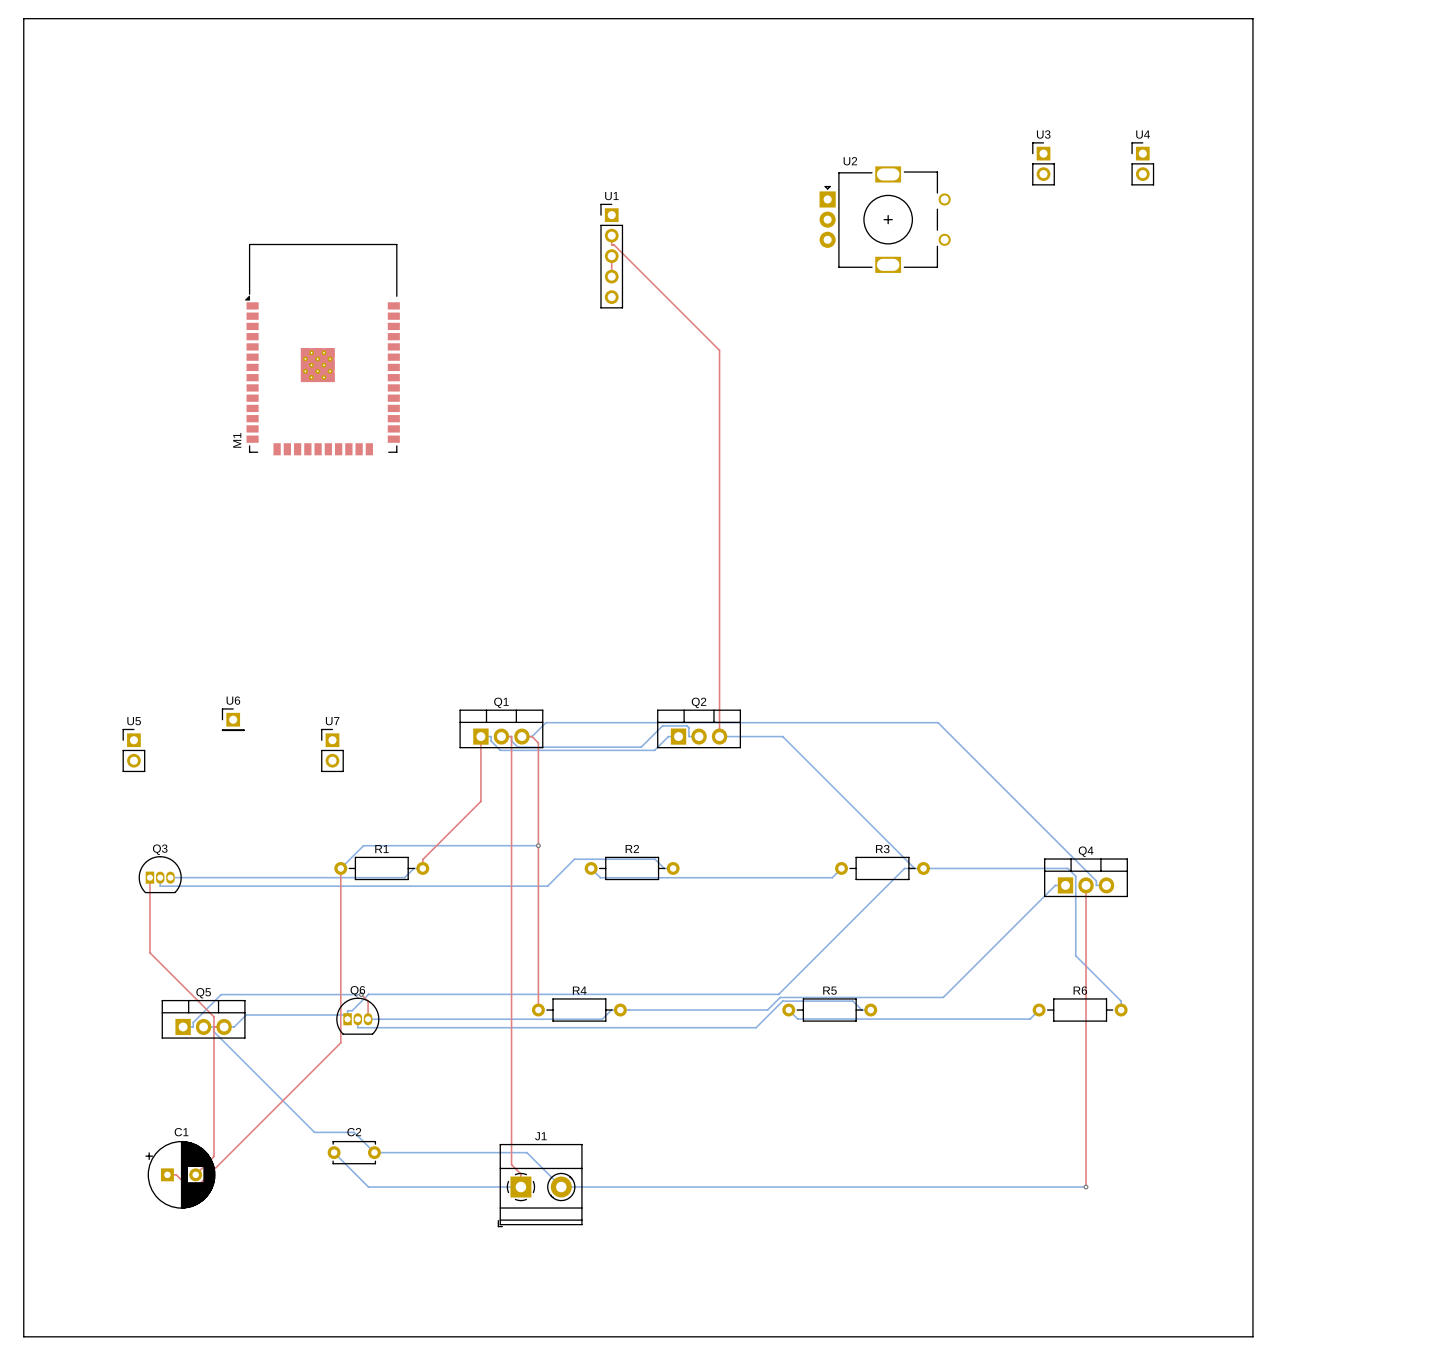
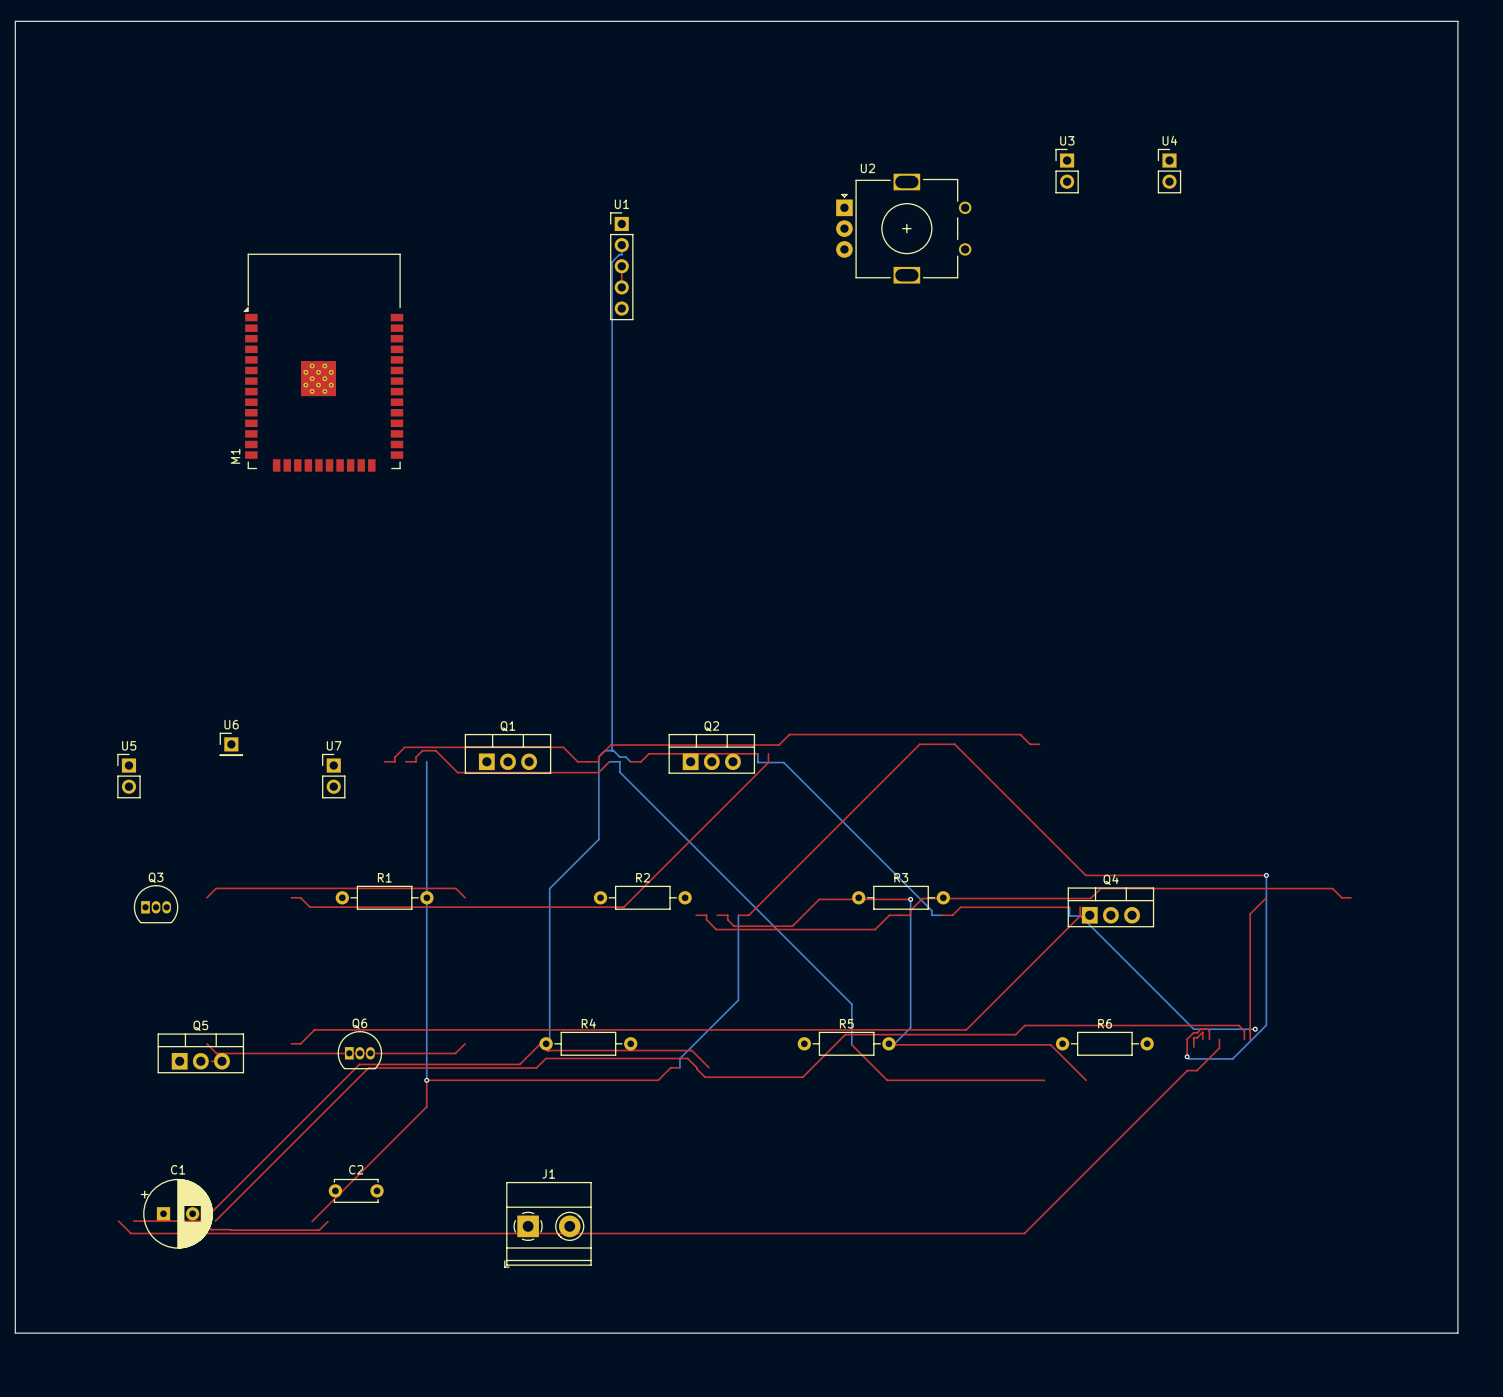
board edge: (1252, 18) (1252, 1336) (23, 1336) (23, 1290) -> (1283, 21) (1457, 21) (1457, 1333) (15, 1333)
top track: (611, 235) (611, 244) (614, 244) (719, 350) (719, 736) -> none
bottom track: none -> (621, 245) (621, 254) (612, 261) (612, 750)
top track: none -> (1039, 744) (1030, 744) (1020, 734) (789, 734) (779, 745) (610, 745) (598, 757) (598, 761) (577, 761) (563, 747) (404, 747) (394, 757) (394, 761) (384, 761)
top track: none -> (757, 753) (649, 753) (641, 761) (630, 761)
bottom track: none -> (757, 753) (757, 762) (783, 762) (931, 910) (931, 915) (942, 915)
top track: none -> (768, 753) (768, 762) (623, 907) (309, 907) (300, 897) (291, 897)
top track: none -> (405, 761) (416, 761) (416, 757) (422, 750) (435, 750) (457, 772) (598, 772) (609, 761)
bottom track: none -> (426, 761) (426, 1080)
top track: (480, 736) (480, 801) (422, 859) (422, 868) -> none
bottom track: (480, 736) (491, 736) (491, 741) (500, 750) (654, 750) (668, 736) (678, 736) -> none
top track: (501, 736) (511, 736) (511, 1164) (520, 1174) (520, 1187) -> none
bottom track: (501, 736) (511, 736) (511, 740) (517, 747) (641, 747) (662, 725) (687, 725) (688, 736) (699, 736) -> none
top track: (521, 736) (532, 736) (538, 742) (538, 1010) -> none
bottom track: (521, 736) (532, 736) (545, 722) (938, 722) (1096, 880) (1096, 885) (1106, 885) -> none
bottom track: none -> (609, 761) (619, 761) (619, 772) (851, 1004) (851, 1044)
bottom track: none -> (630, 761) (625, 757) (619, 757) (613, 750) (604, 750) (598, 756) (598, 839) (549, 888) (549, 1043)
bottom track: (719, 736) (782, 736) (914, 868) -> none
bottom track: (538, 845) (363, 845) (340, 868) -> none
via: (538, 845) -> none
top track: none -> (1266, 875) (1085, 875) (954, 744) (919, 744) (748, 915) (738, 915)
bottom track: none -> (1266, 875) (1266, 1025) (1232, 1058) (1189, 1058) (1187, 1056)
via: none -> (1266, 875)
top track: none -> (206, 897) (216, 888) (455, 888) (465, 897)
top track: (340, 868) (340, 1042) (199, 1183) (185, 1183) (176, 1174) (167, 1174) -> none
bottom track: (422, 868) (413, 868) (404, 877) (170, 877) -> none
bottom track: (591, 868) (600, 877) (832, 877) (841, 868) -> none
bottom track: (673, 868) (664, 868) (655, 859) (574, 859) (547, 886) (160, 886) (160, 877) -> none
top track: none -> (1266, 897) (1250, 913) (1250, 1039)
top track: none -> (1350, 897) (1341, 897) (1332, 888) (1100, 888) (1090, 898) (922, 898) (910, 910) (910, 915) (889, 915) (875, 929) (716, 929) (706, 919) (706, 915) (696, 915)
top track: none -> (910, 899) (819, 899) (792, 926) (734, 926) (727, 919) (727, 915) (717, 915)
bottom track: none -> (910, 899) (910, 1027) (893, 1044)
via: none -> (910, 899)
top track: (149, 877) (149, 952) (213, 1016) (213, 1156) (195, 1174) -> none
top track: none -> (1069, 907) (960, 907) (952, 915) (942, 915)
bottom track: none -> (1069, 907) (1069, 916) (1080, 916) (1193, 1029) (1255, 1029)
top track: none -> (1080, 907) (1080, 916) (966, 1029) (314, 1029) (300, 1043) (291, 1043)
bottom track: none -> (738, 915) (738, 1000) (679, 1058) (679, 1067)
bottom track: (1065, 885) (1055, 885) (943, 997) (780, 997) (767, 1010) (611, 1010) (602, 1019) (368, 1019) -> none
top track: (1086, 885) (1086, 1187) -> none
top track: (361, 994) (368, 1001) (368, 1019) -> none
bottom track: (361, 994) (221, 994) (193, 1022) (193, 1026) (183, 1026) -> none
via: (361, 994) -> none
via: none -> (1255, 1029)
top track: none -> (1202, 1039) (1202, 1032) (1197, 1037) (1193, 1037) (1193, 1047)
top track: none -> (1209, 1039) (1209, 1030) (1207, 1028) (1201, 1028) (1197, 1032) (1193, 1032) (1187, 1039) (1187, 1056)
top track: none -> (1219, 1039) (1219, 1048) (1196, 1070) (1187, 1070) (1024, 1233) (130, 1233) (118, 1221)
top track: none -> (1244, 1039) (1244, 1030) (1238, 1025) (1024, 1025) (1015, 1034) (845, 1034) (802, 1077) (705, 1077) (687, 1058) (545, 1058) (536, 1068) (368, 1068) (215, 1221)
top track: none -> (206, 1043) (216, 1053) (455, 1053) (465, 1043)
bottom track: (788, 1010) (797, 1019) (1030, 1019) (1039, 1010) -> none
bottom track: (870, 1010) (861, 1010) (852, 1001) (782, 1001) (756, 1027) (357, 1027) (357, 1019) -> none
bottom track: (1121, 1010) (1121, 1001) (1075, 955) (1075, 876) (1067, 868) (904, 868) (778, 994) (368, 994) (352, 1010) (347, 1010) (347, 1019) -> none
top track: none -> (851, 1044) (887, 1080) (1044, 1080)
top track: none -> (893, 1044) (1050, 1044) (1086, 1080)
bottom track: (347, 1014) (246, 1014) (234, 1026) (224, 1026) -> none
via: none -> (1187, 1056)
bottom track: (203, 1026) (213, 1026) (213, 1031) (314, 1132) (354, 1132) (374, 1152) (526, 1152) (561, 1187) (1086, 1187) -> none
top track: none -> (679, 1067) (670, 1067) (658, 1080) (426, 1080) (426, 1106) (312, 1221)
top track: none -> (709, 1067) (691, 1050) (547, 1051) (540, 1043) (519, 1064) (359, 1064) (208, 1215) (208, 1226) (211, 1229) (319, 1230) (327, 1221)
via: none -> (426, 1080)
bottom track: (334, 1152) (368, 1187) (520, 1187) -> none
top track: none -> (133, 1221) (208, 1221)
via: (1086, 1187) -> none

